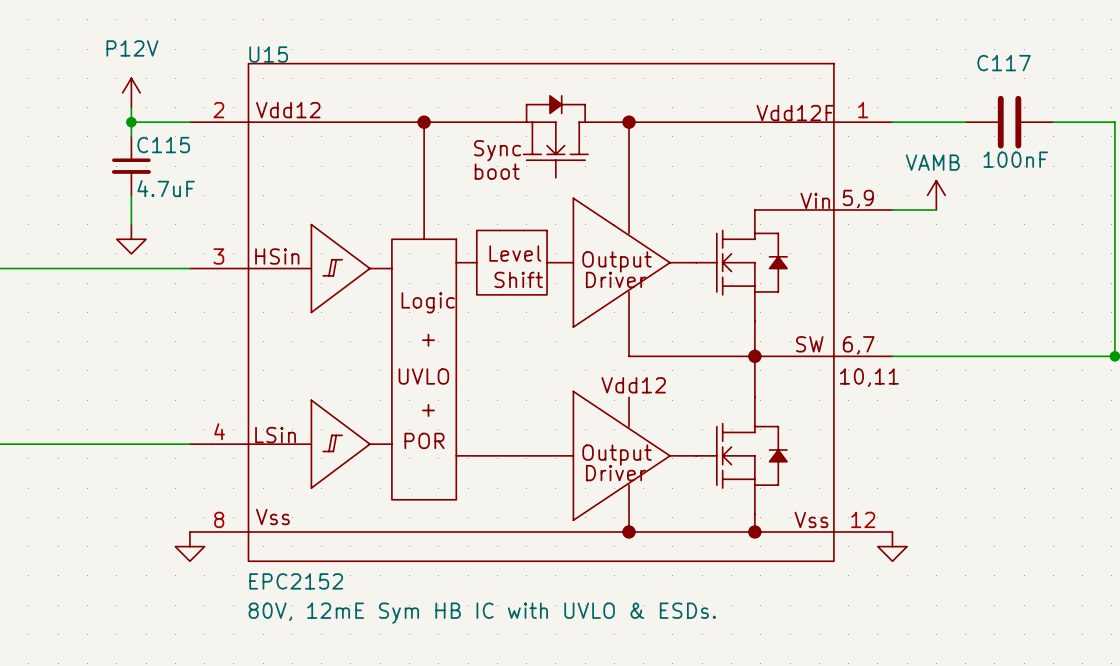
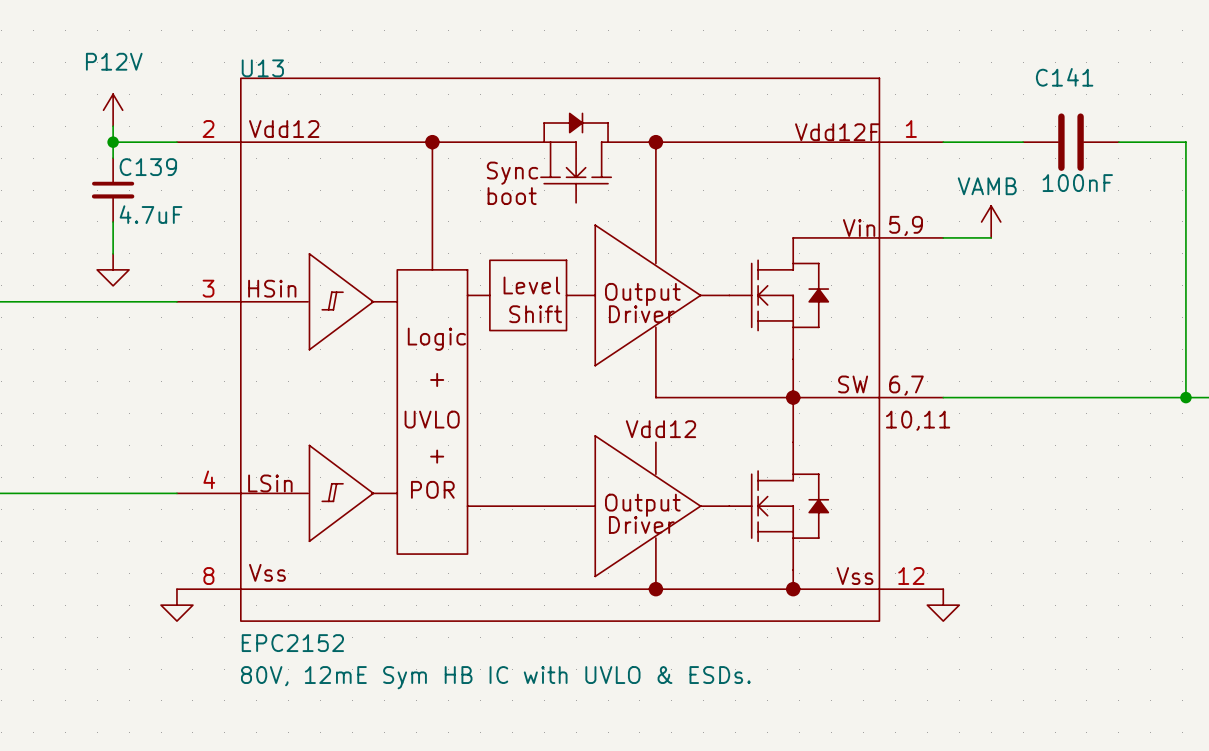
U15 name: U15 (268, 54) -> U13 (262, 68)
C117 name: C117 (1004, 63) -> C141 (1064, 77)
C115 name: C115 (163, 145) -> C139 (148, 167)

